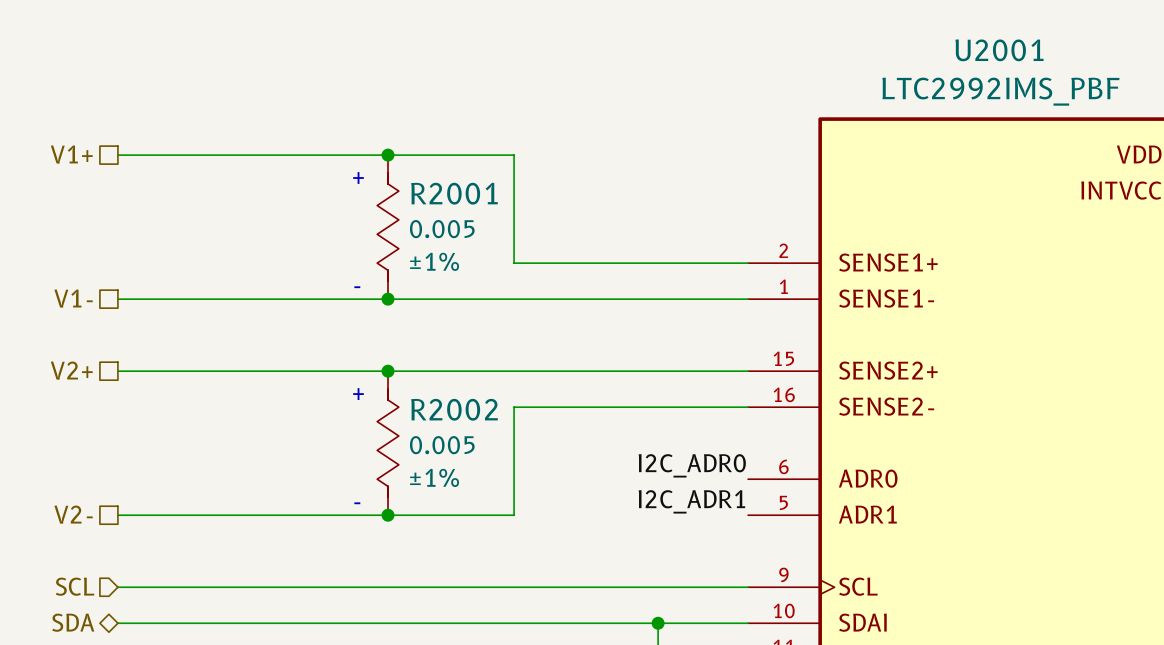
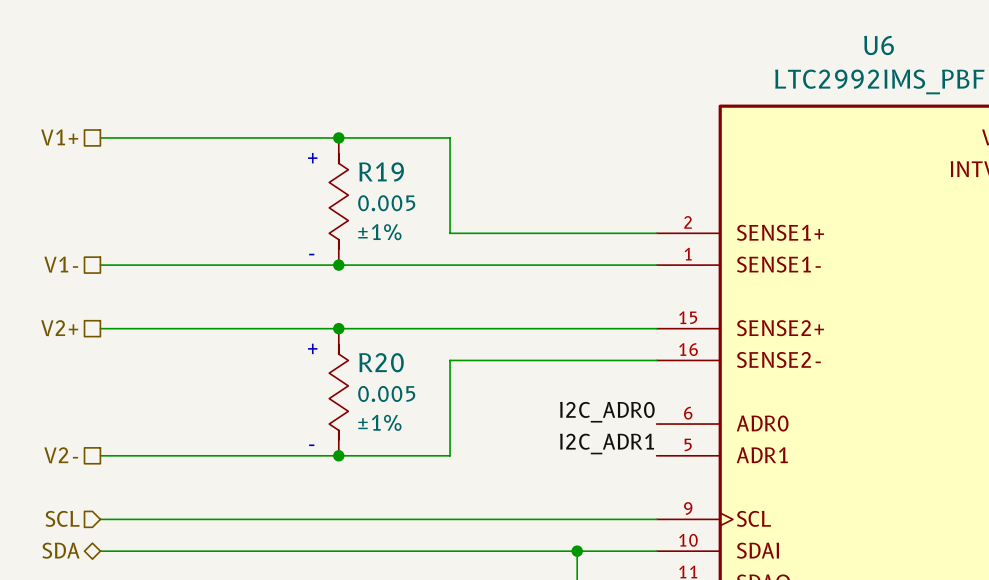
U2001 name: U2001 (999, 50) -> U6 (879, 45)
R2001 name: R2001 (454, 193) -> R19 (381, 171)
R2002 name: R2002 (454, 409) -> R20 (381, 362)

